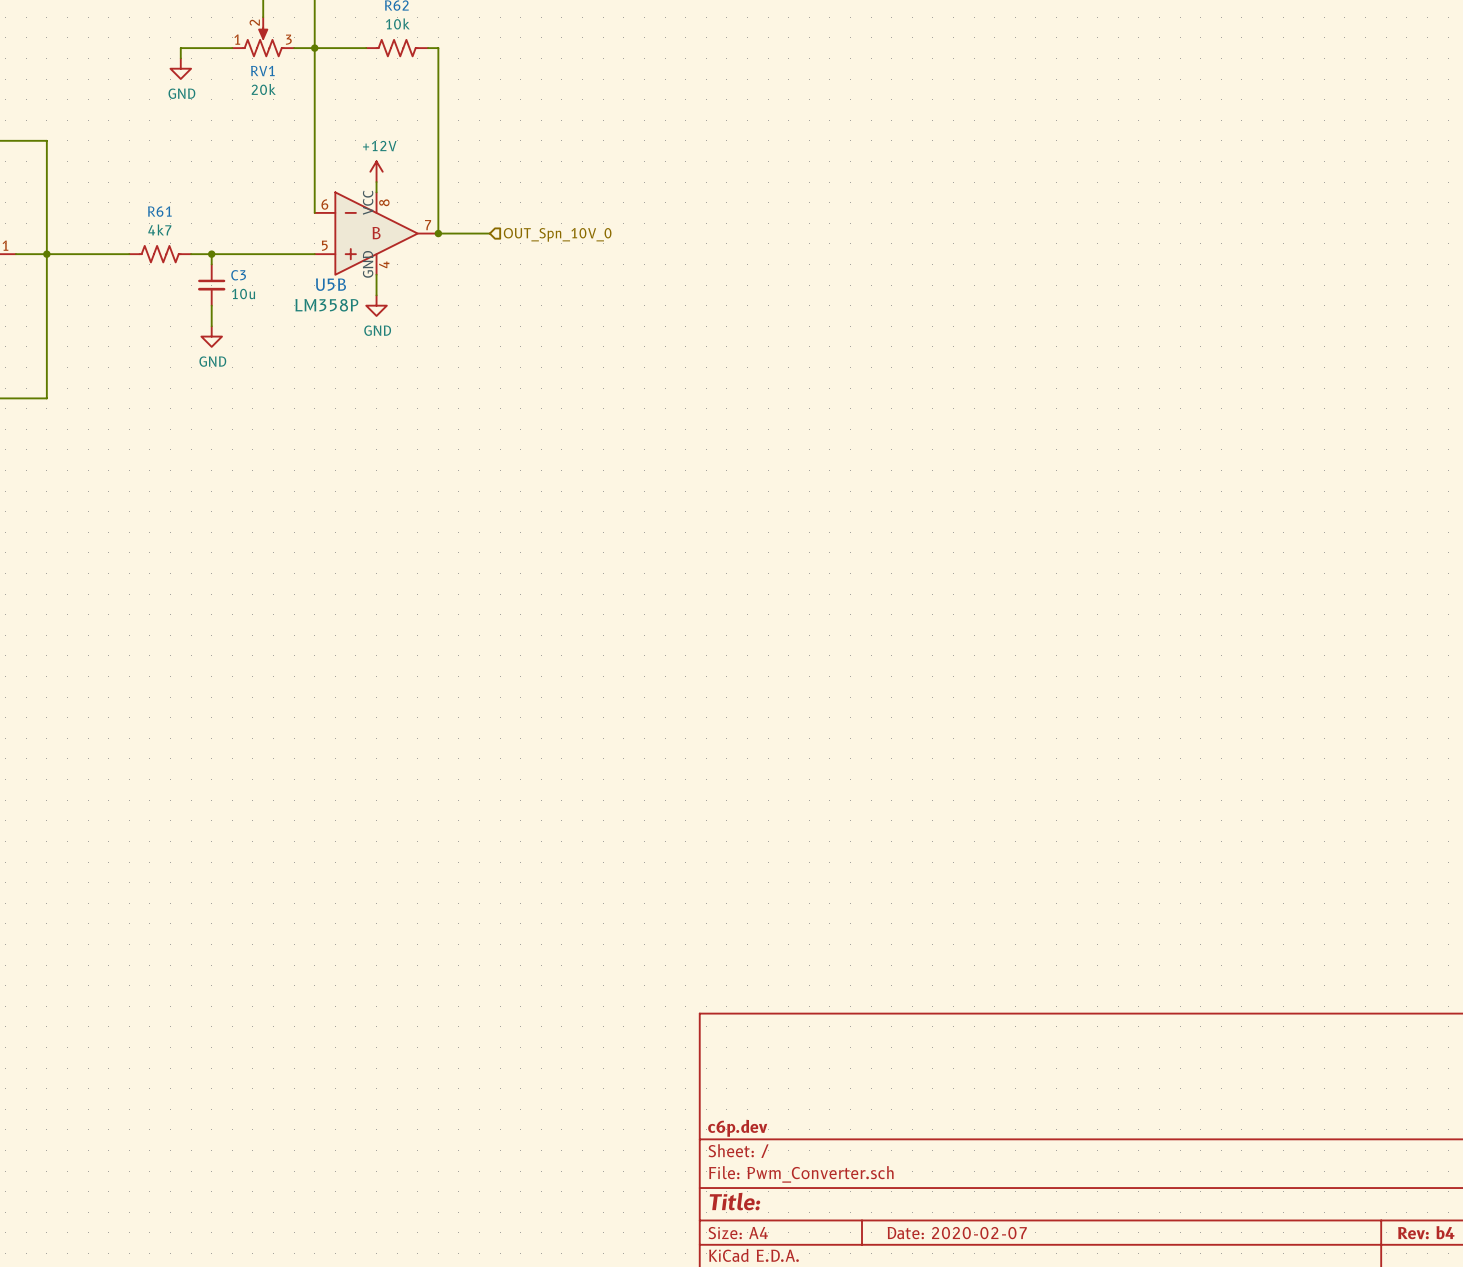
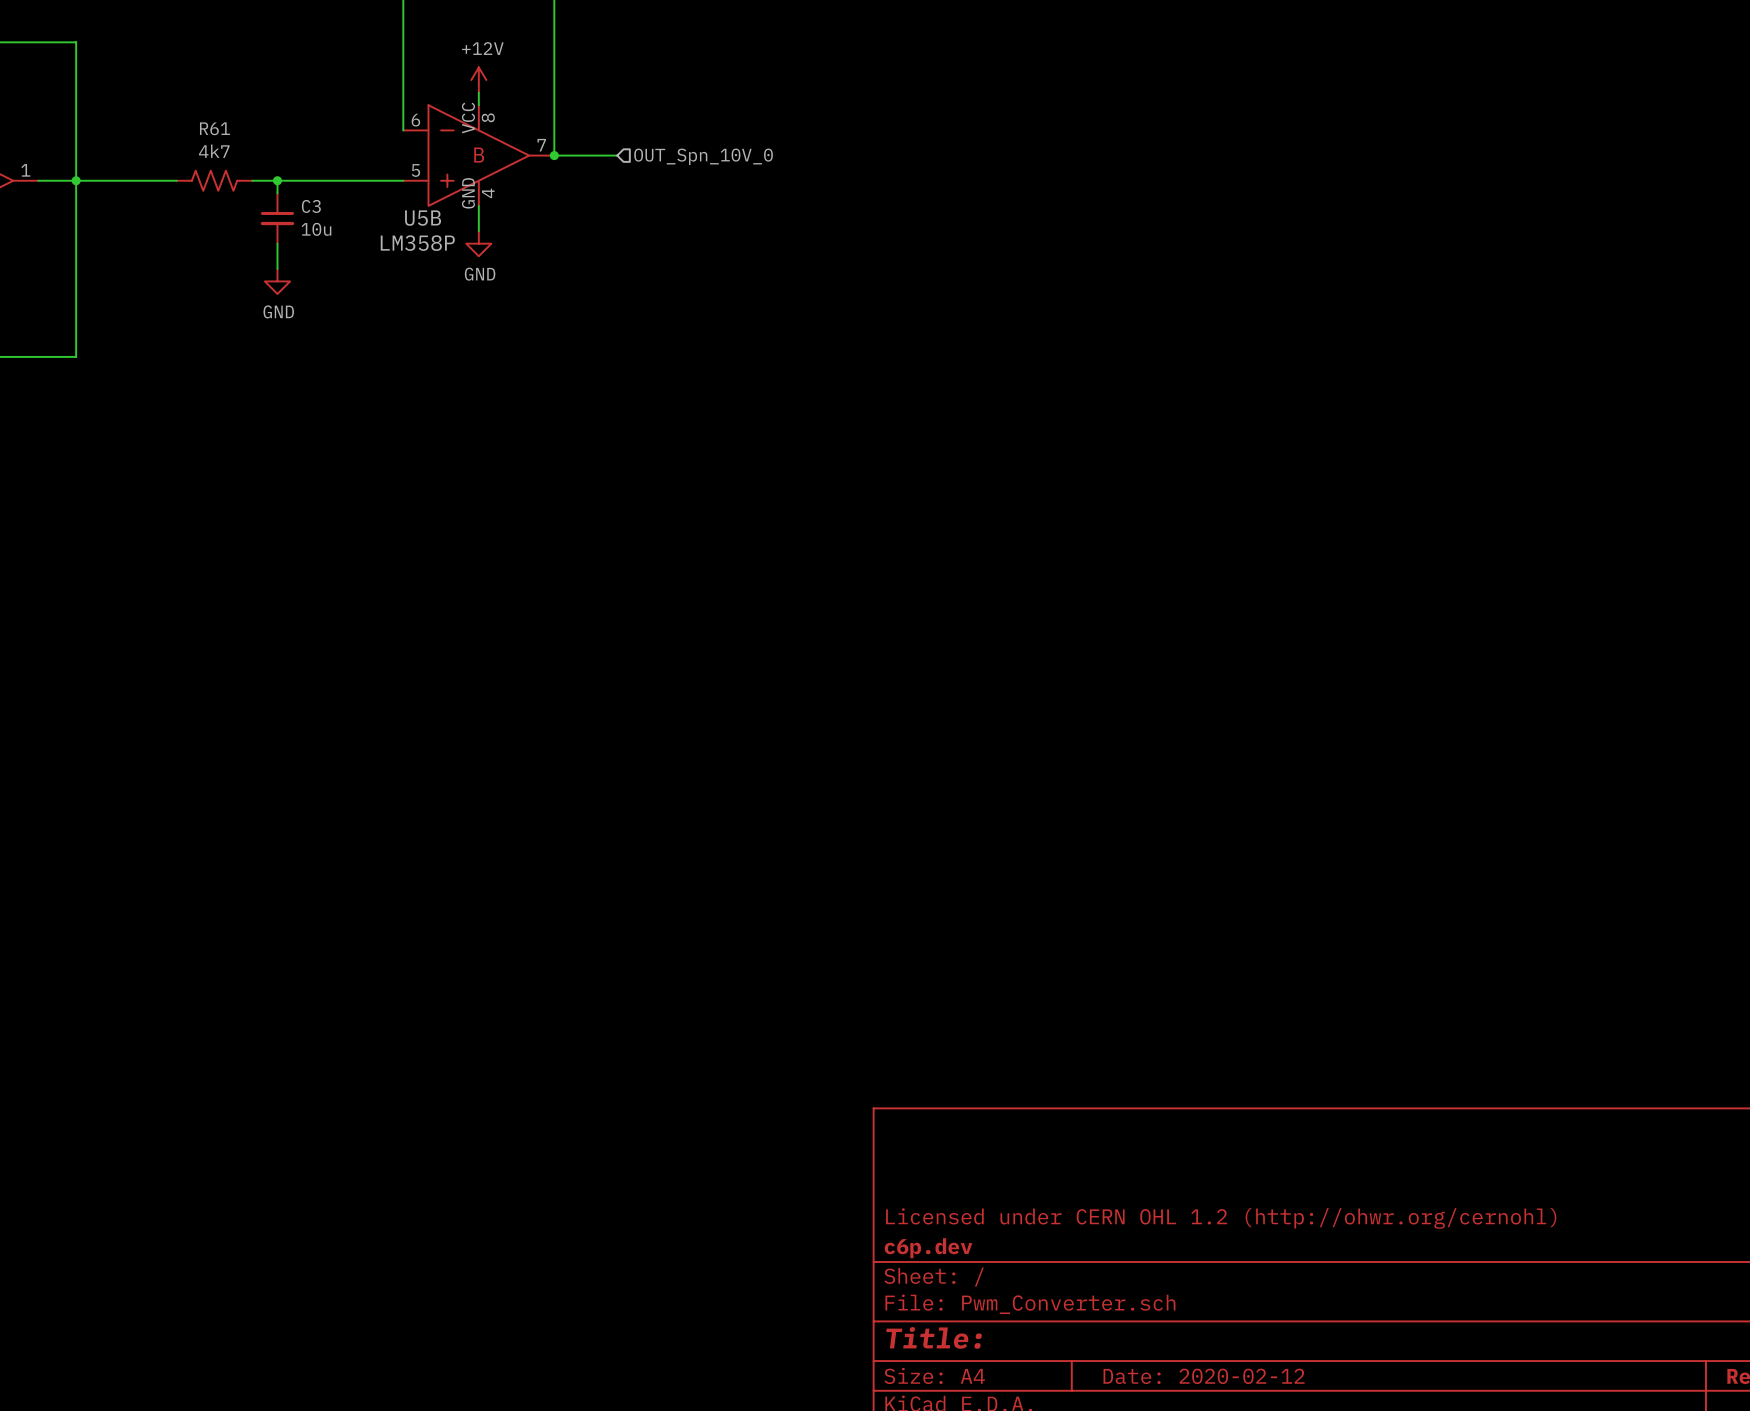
title block: none -> Licensed under CERN OHL 1.2 (http://ohwr.org/cernohl) (1221, 1218)
title block: Date: 2020-02-07 (957, 1233) -> Date: 2020-02-12 (1204, 1376)

